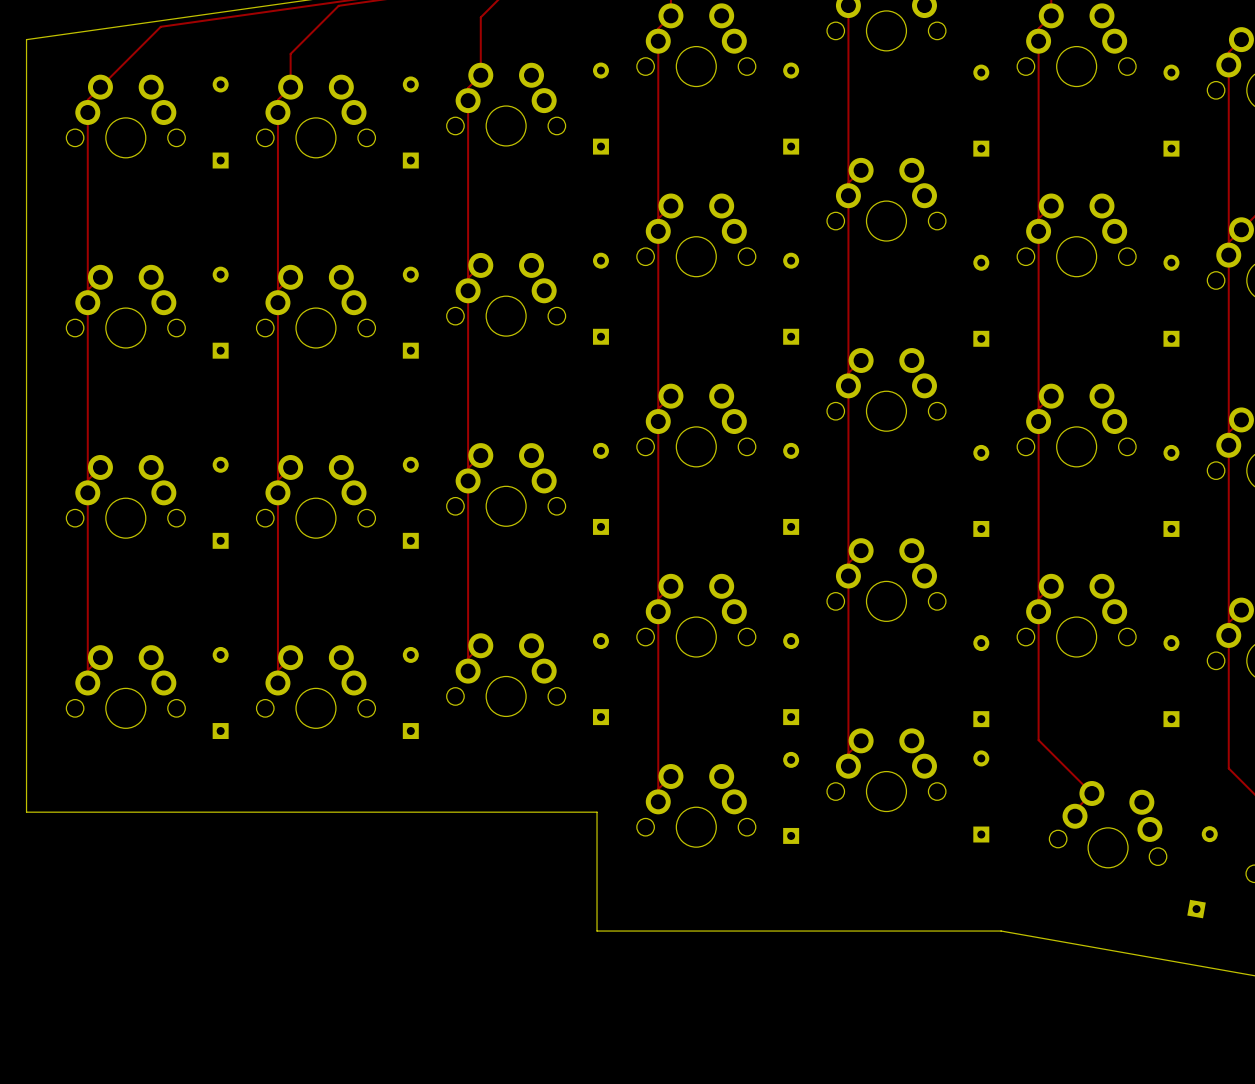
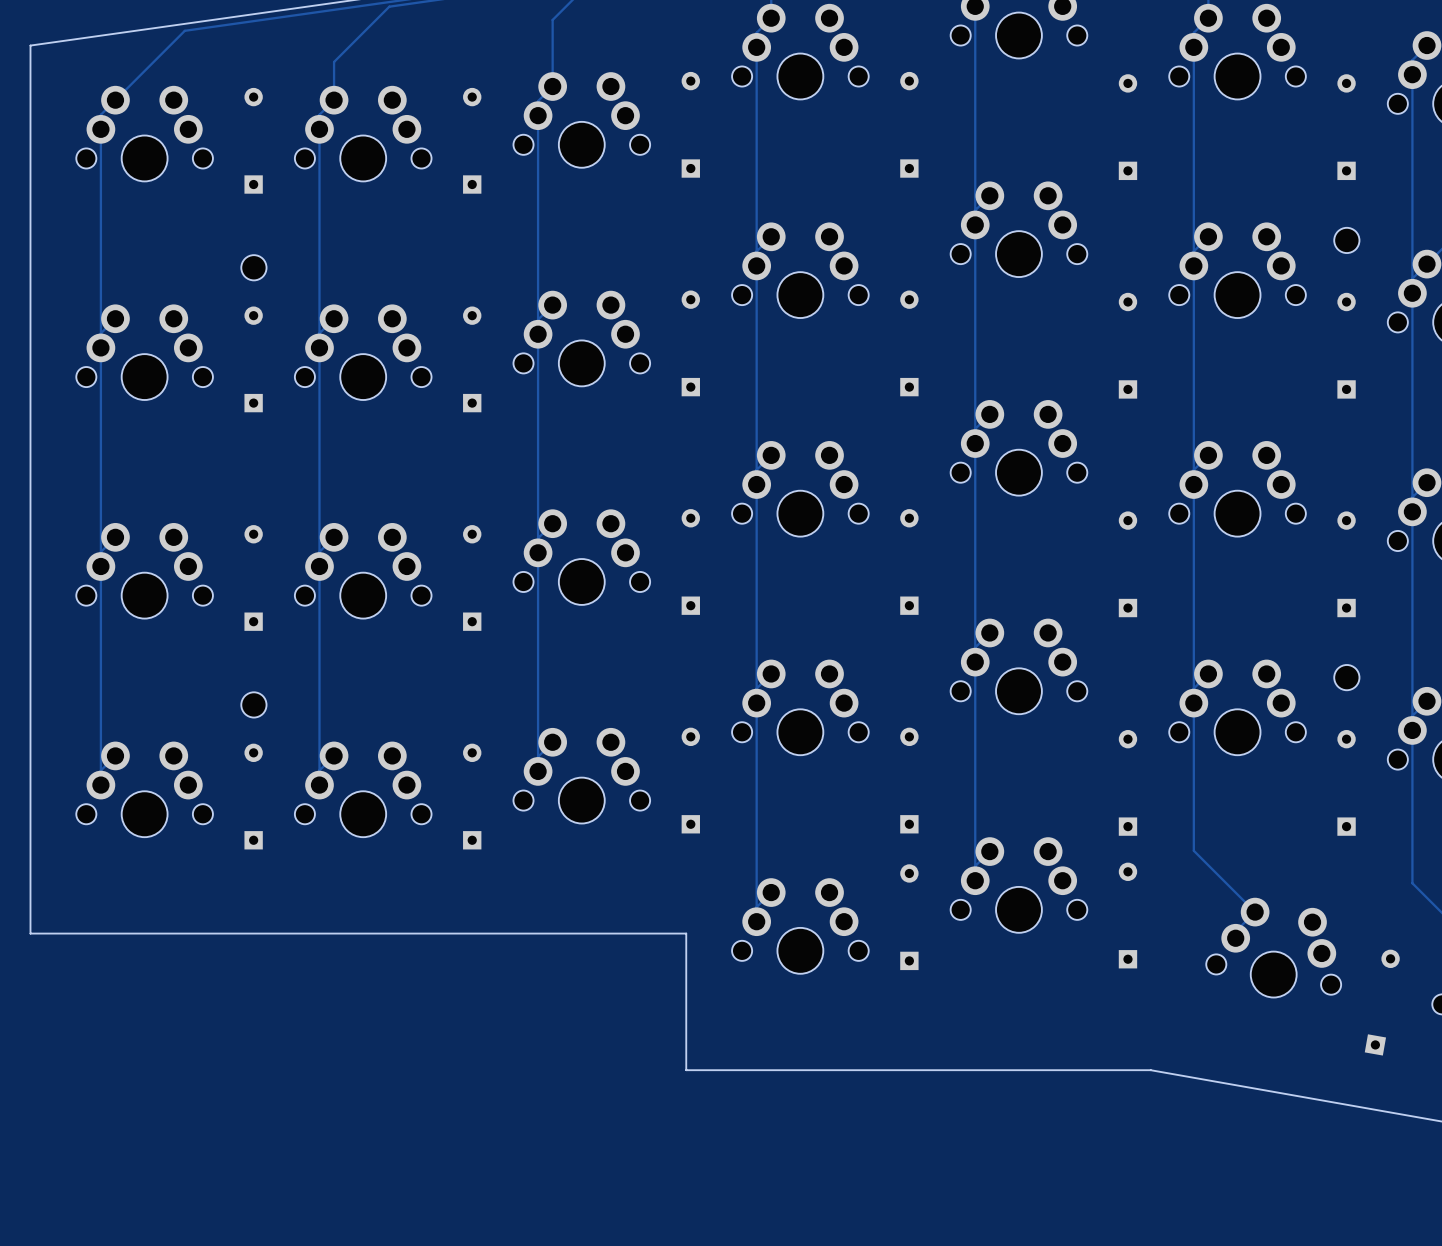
part: none -> (1346, 240)
part: none -> (253, 267)
part: none -> (1346, 677)
part: none -> (253, 704)

